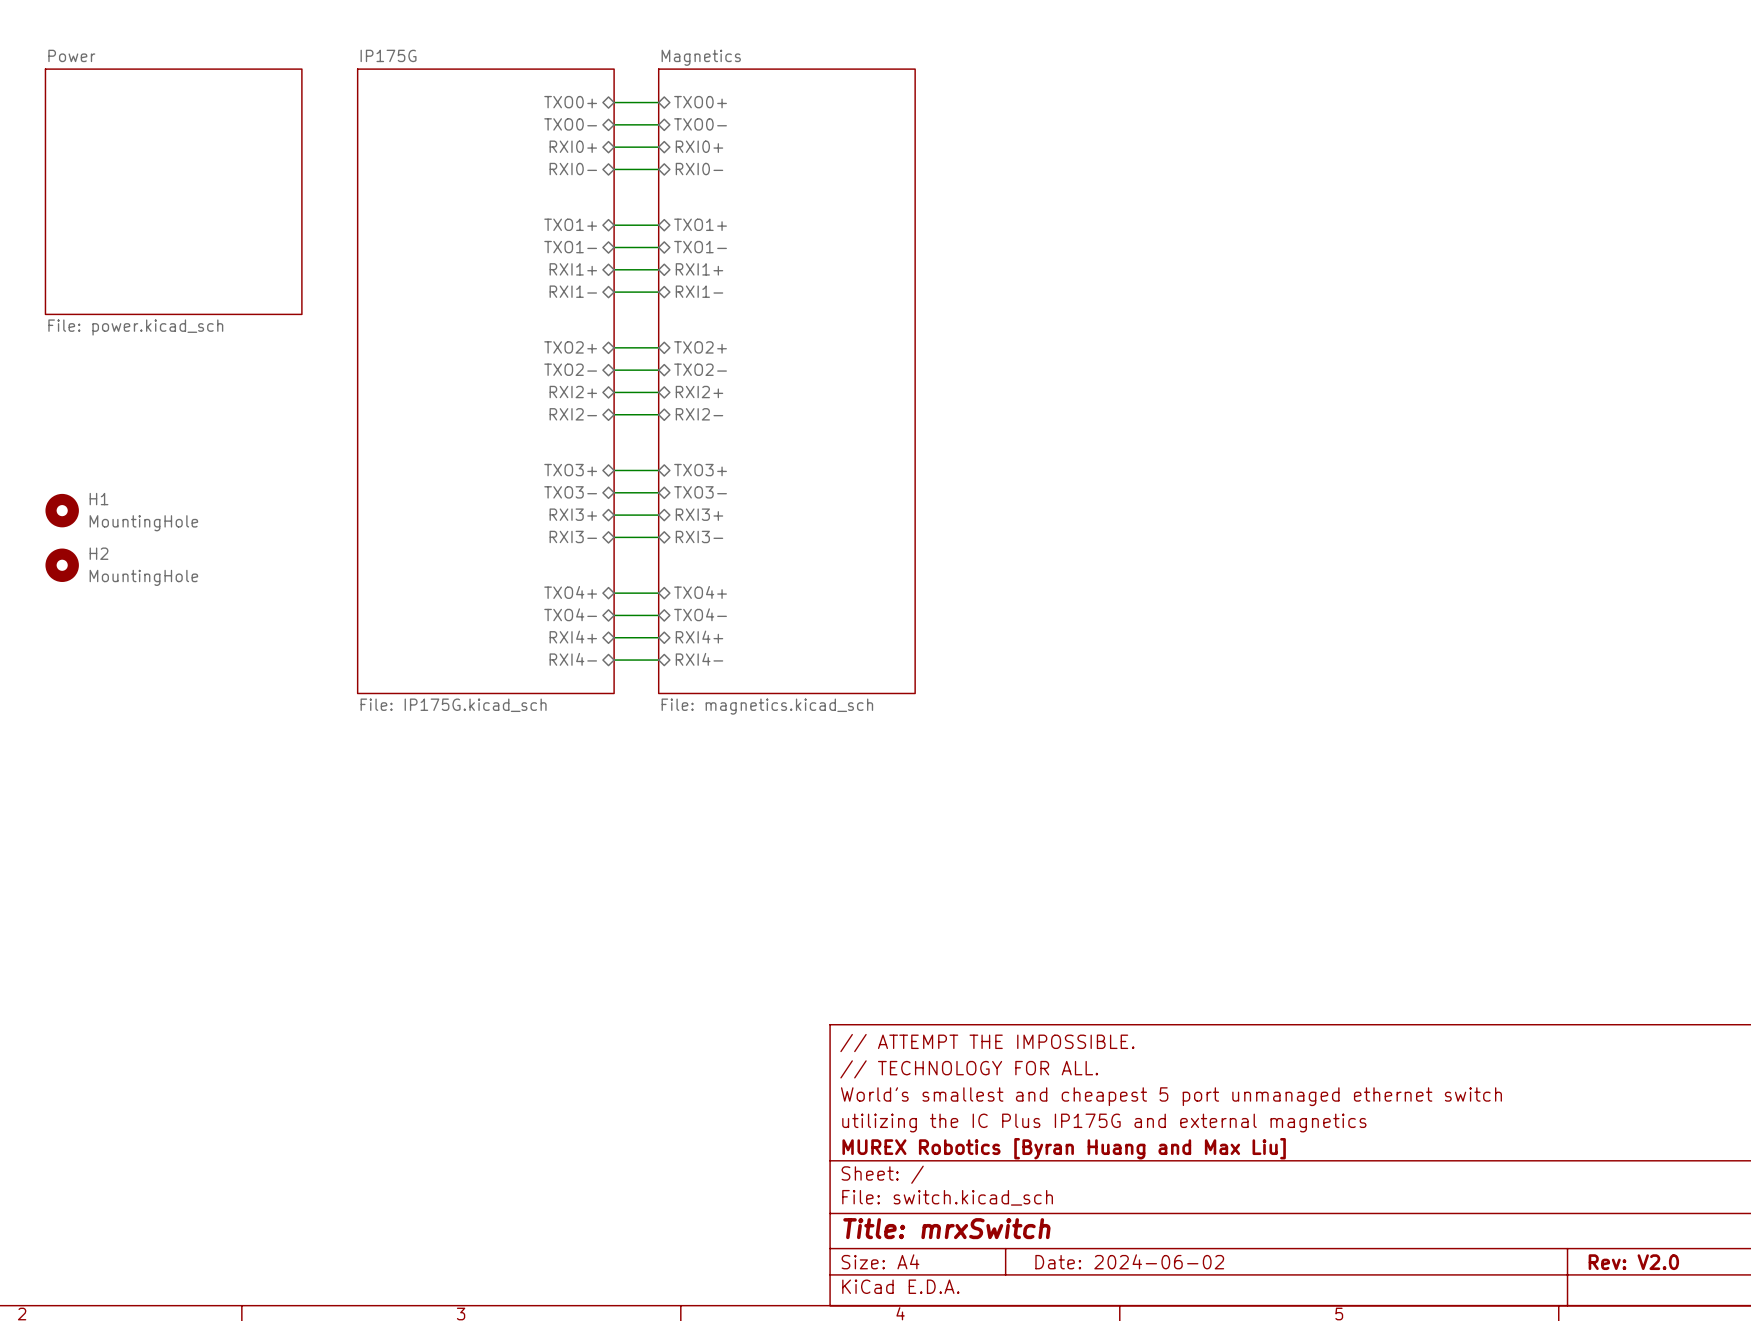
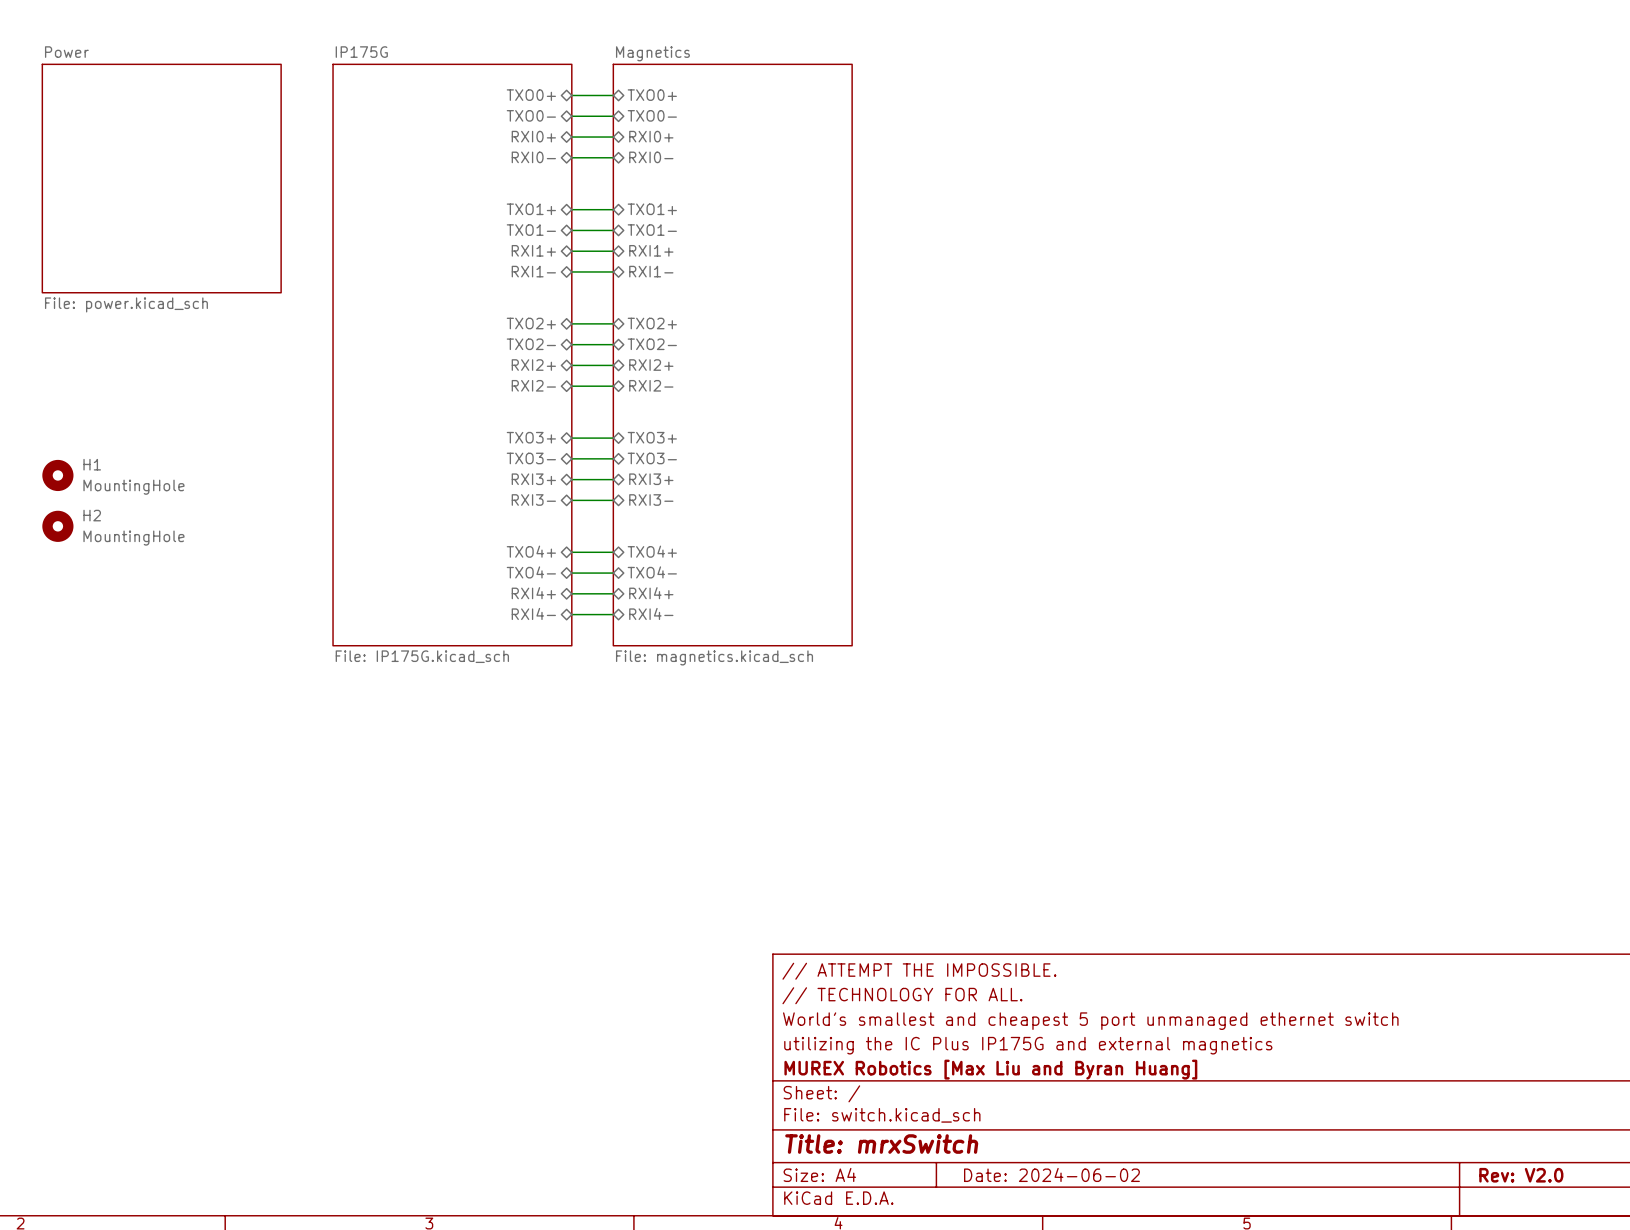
title block: MUREX Robotics [Byran Huang and Max Liu] (1064, 1148) -> MUREX Robotics [Max Liu and Byran Huang] (990, 1069)

